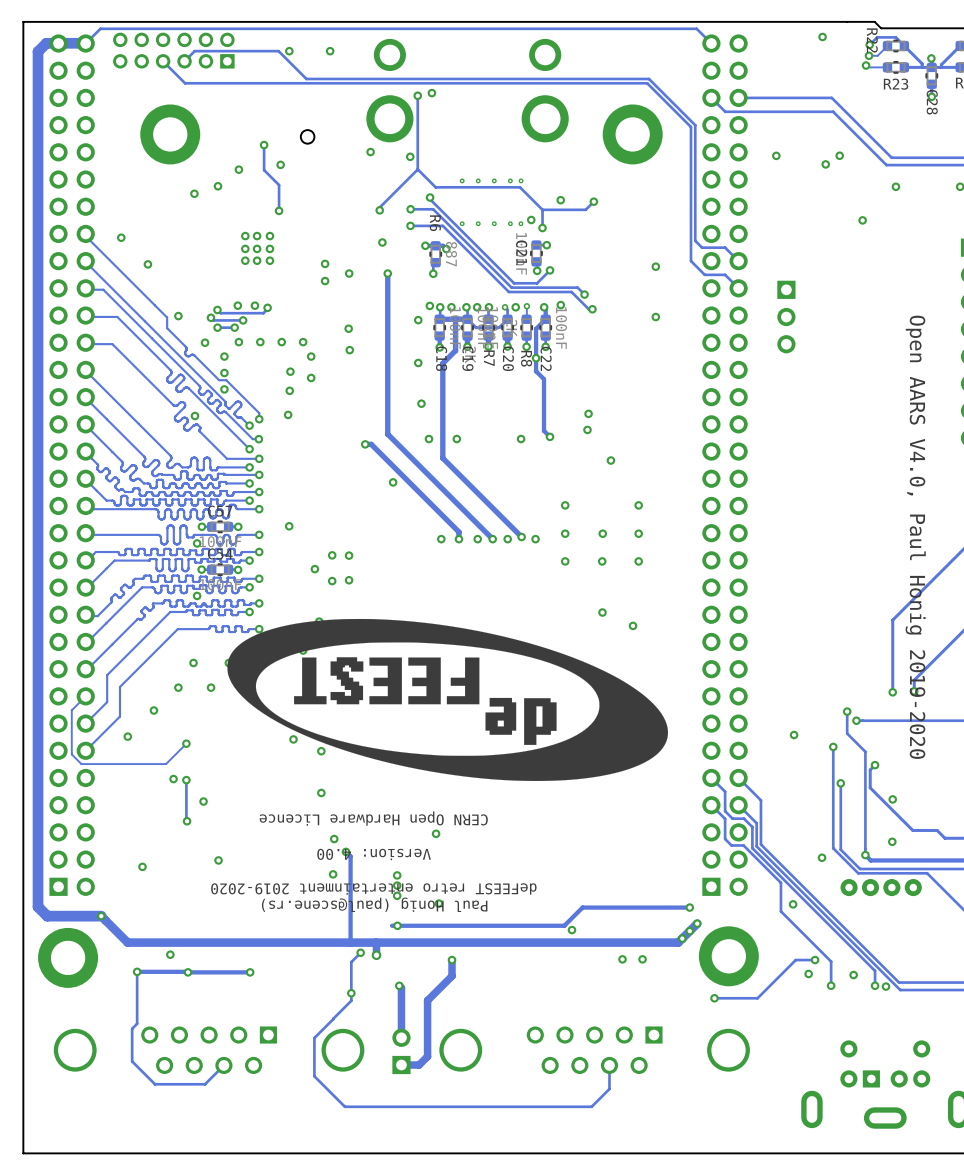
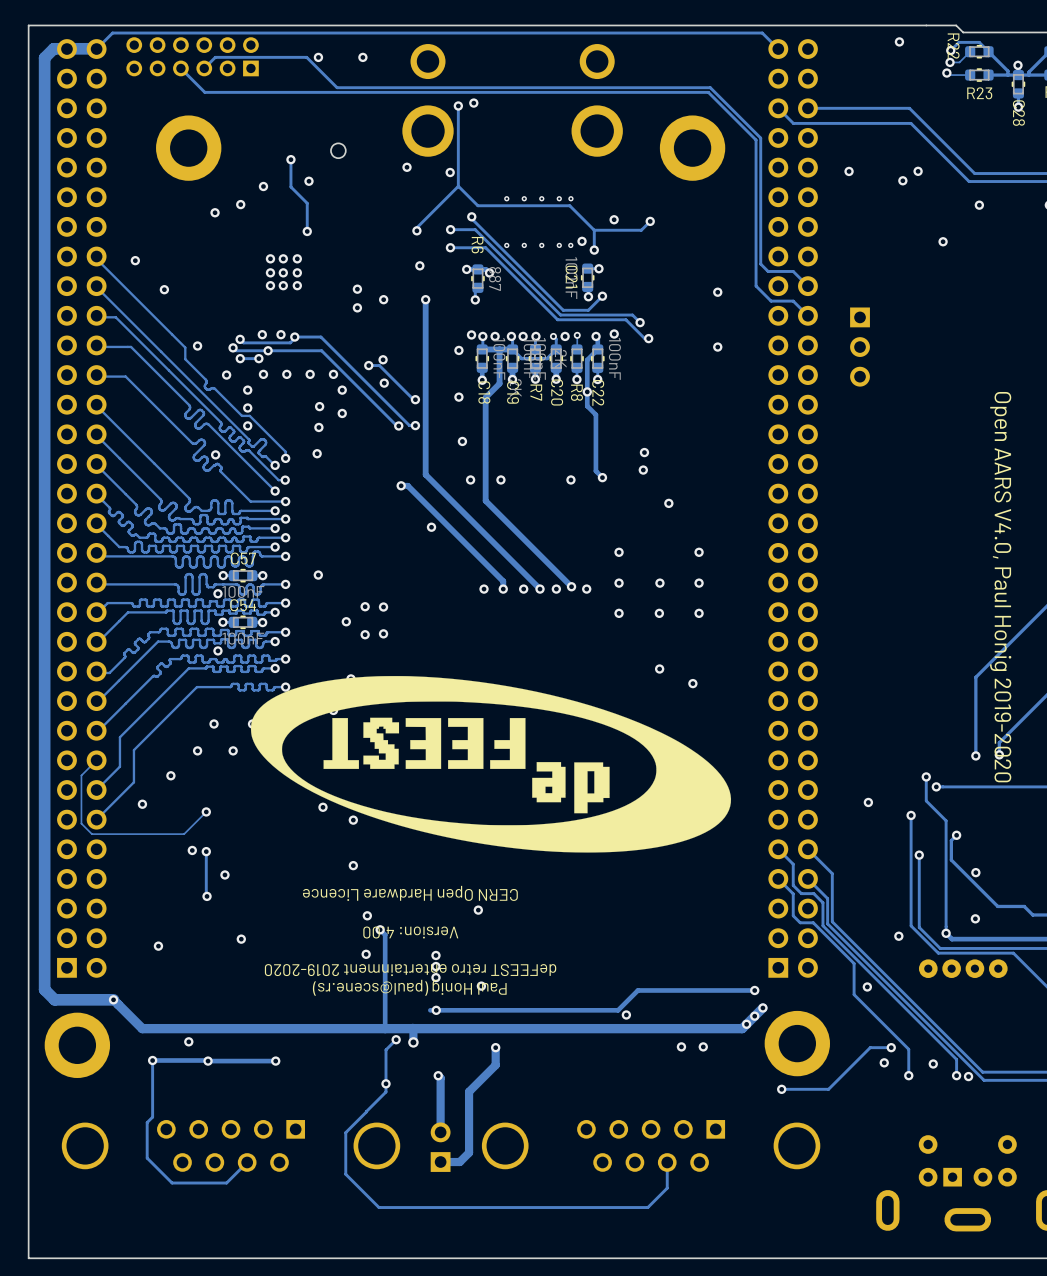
track: none -> (294, 337) (320, 337) (409, 425) (415, 425)
track: none -> (268, 350) (321, 350) (398, 425)
track: none -> (368, 365) (379, 365) (415, 399)
via: none -> (368, 365)
via: none -> (415, 399)
via: none -> (398, 425)
via: none -> (415, 425)

